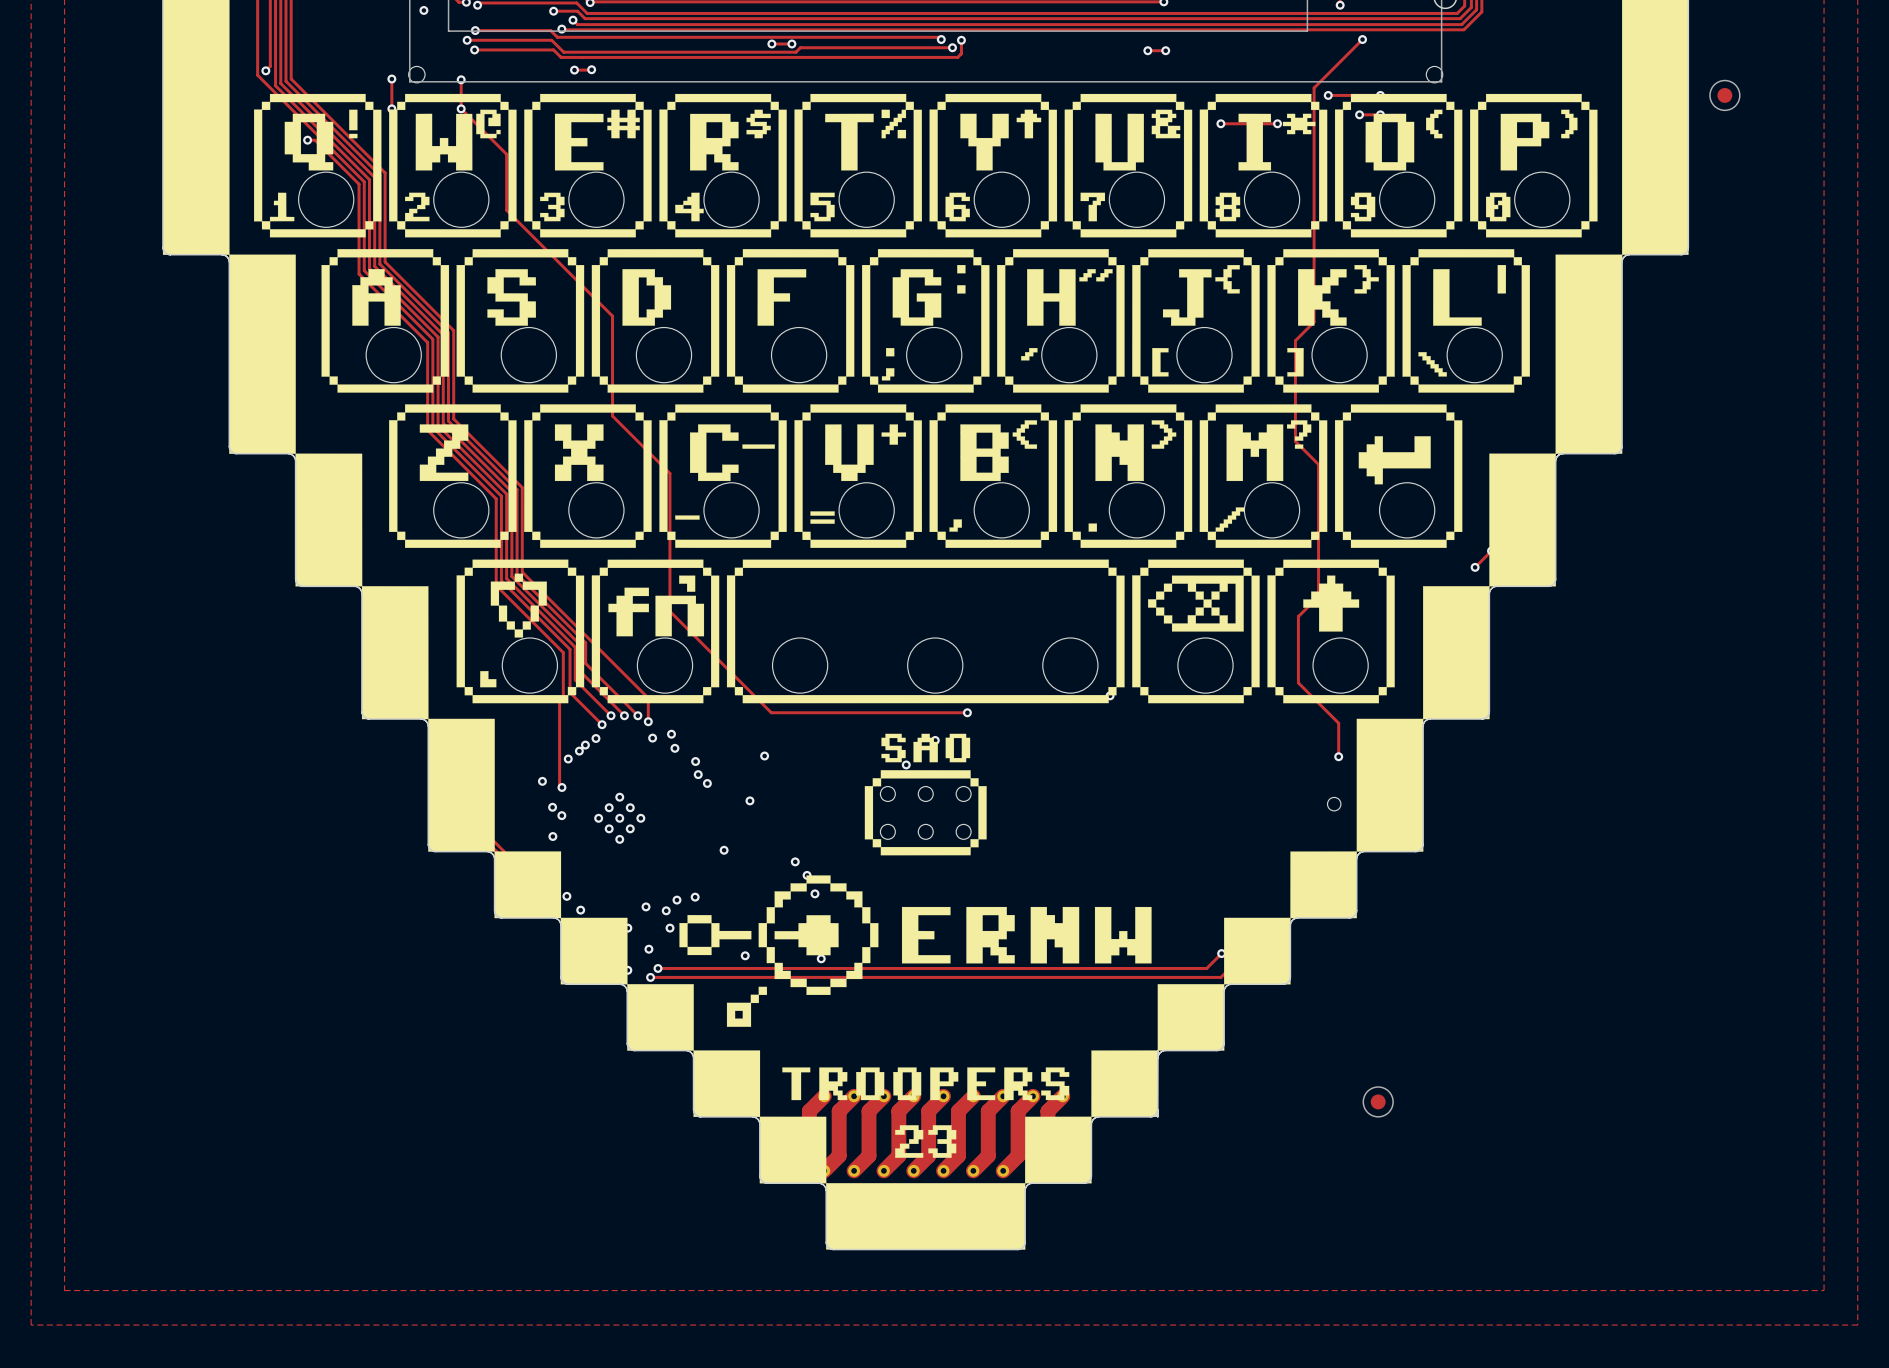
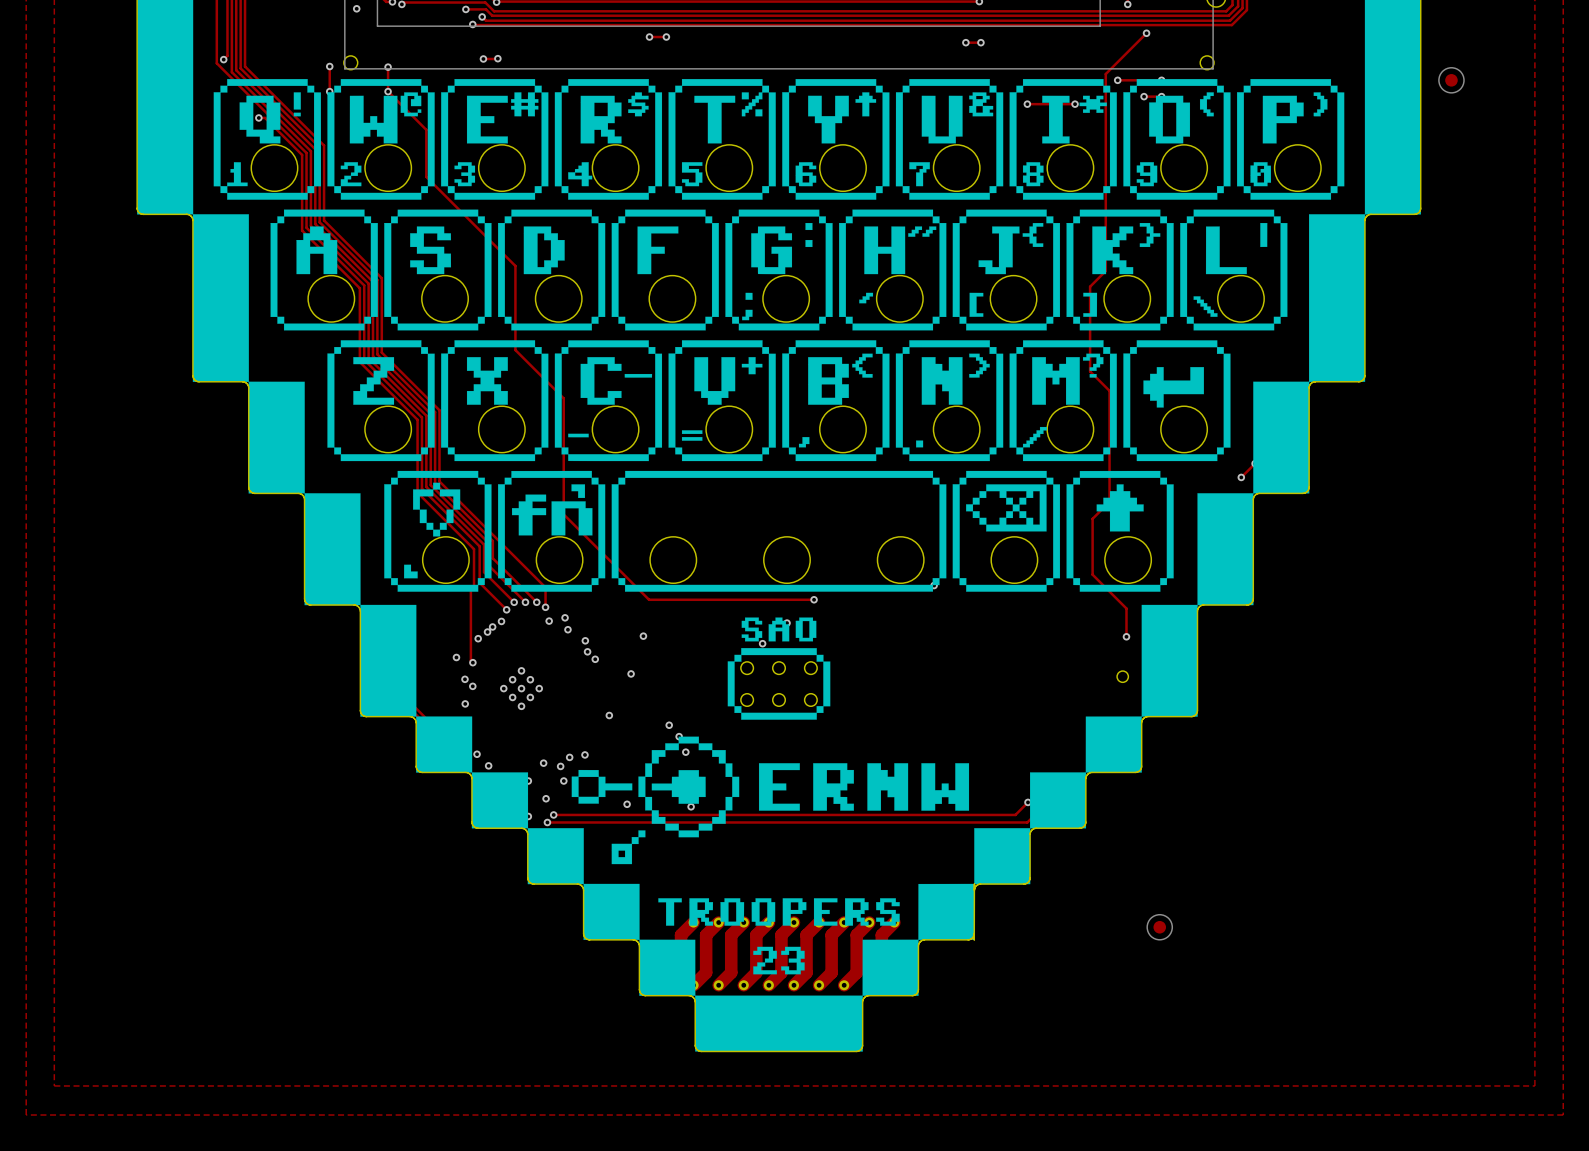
track: (475, 30) (550, 30) (557, 37) (939, 37) (941, 39) -> none
via: (475, 30) -> none
via: (941, 39) -> none
track: (467, 40) (551, 40) (563, 52) (795, 52) (800, 47) (952, 47) -> none
via: (467, 40) -> none
track: (961, 40) (961, 53) (957, 57) (561, 57) (553, 49) (474, 49) -> none
via: (961, 40) -> none
via: (952, 47) -> none
via: (474, 49) -> none

